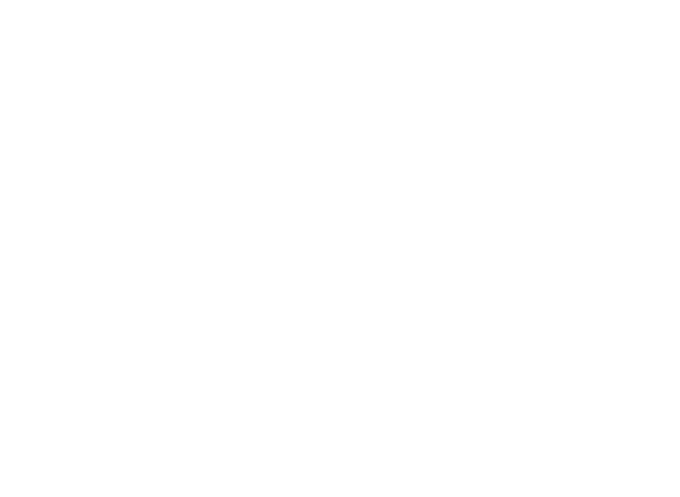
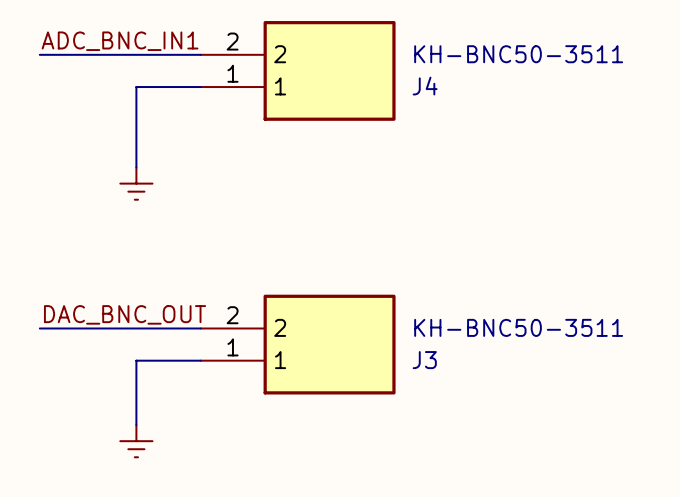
label: none -> ADC_BNC_IN1 (120, 41)
wire: none -> (39, 54) (200, 54)
J4: none -> KH-BNC50-3511 (298, 70)
wire: none -> (200, 87) (136, 87) (136, 167)
power symbol: none -> (136, 183)
label: none -> DAC_BNC_OUT (125, 314)
wire: none -> (39, 328) (200, 328)
J3: none -> KH-BNC50-3511 (298, 344)
wire: none -> (200, 360) (136, 360) (136, 425)
power symbol: none -> (136, 441)

